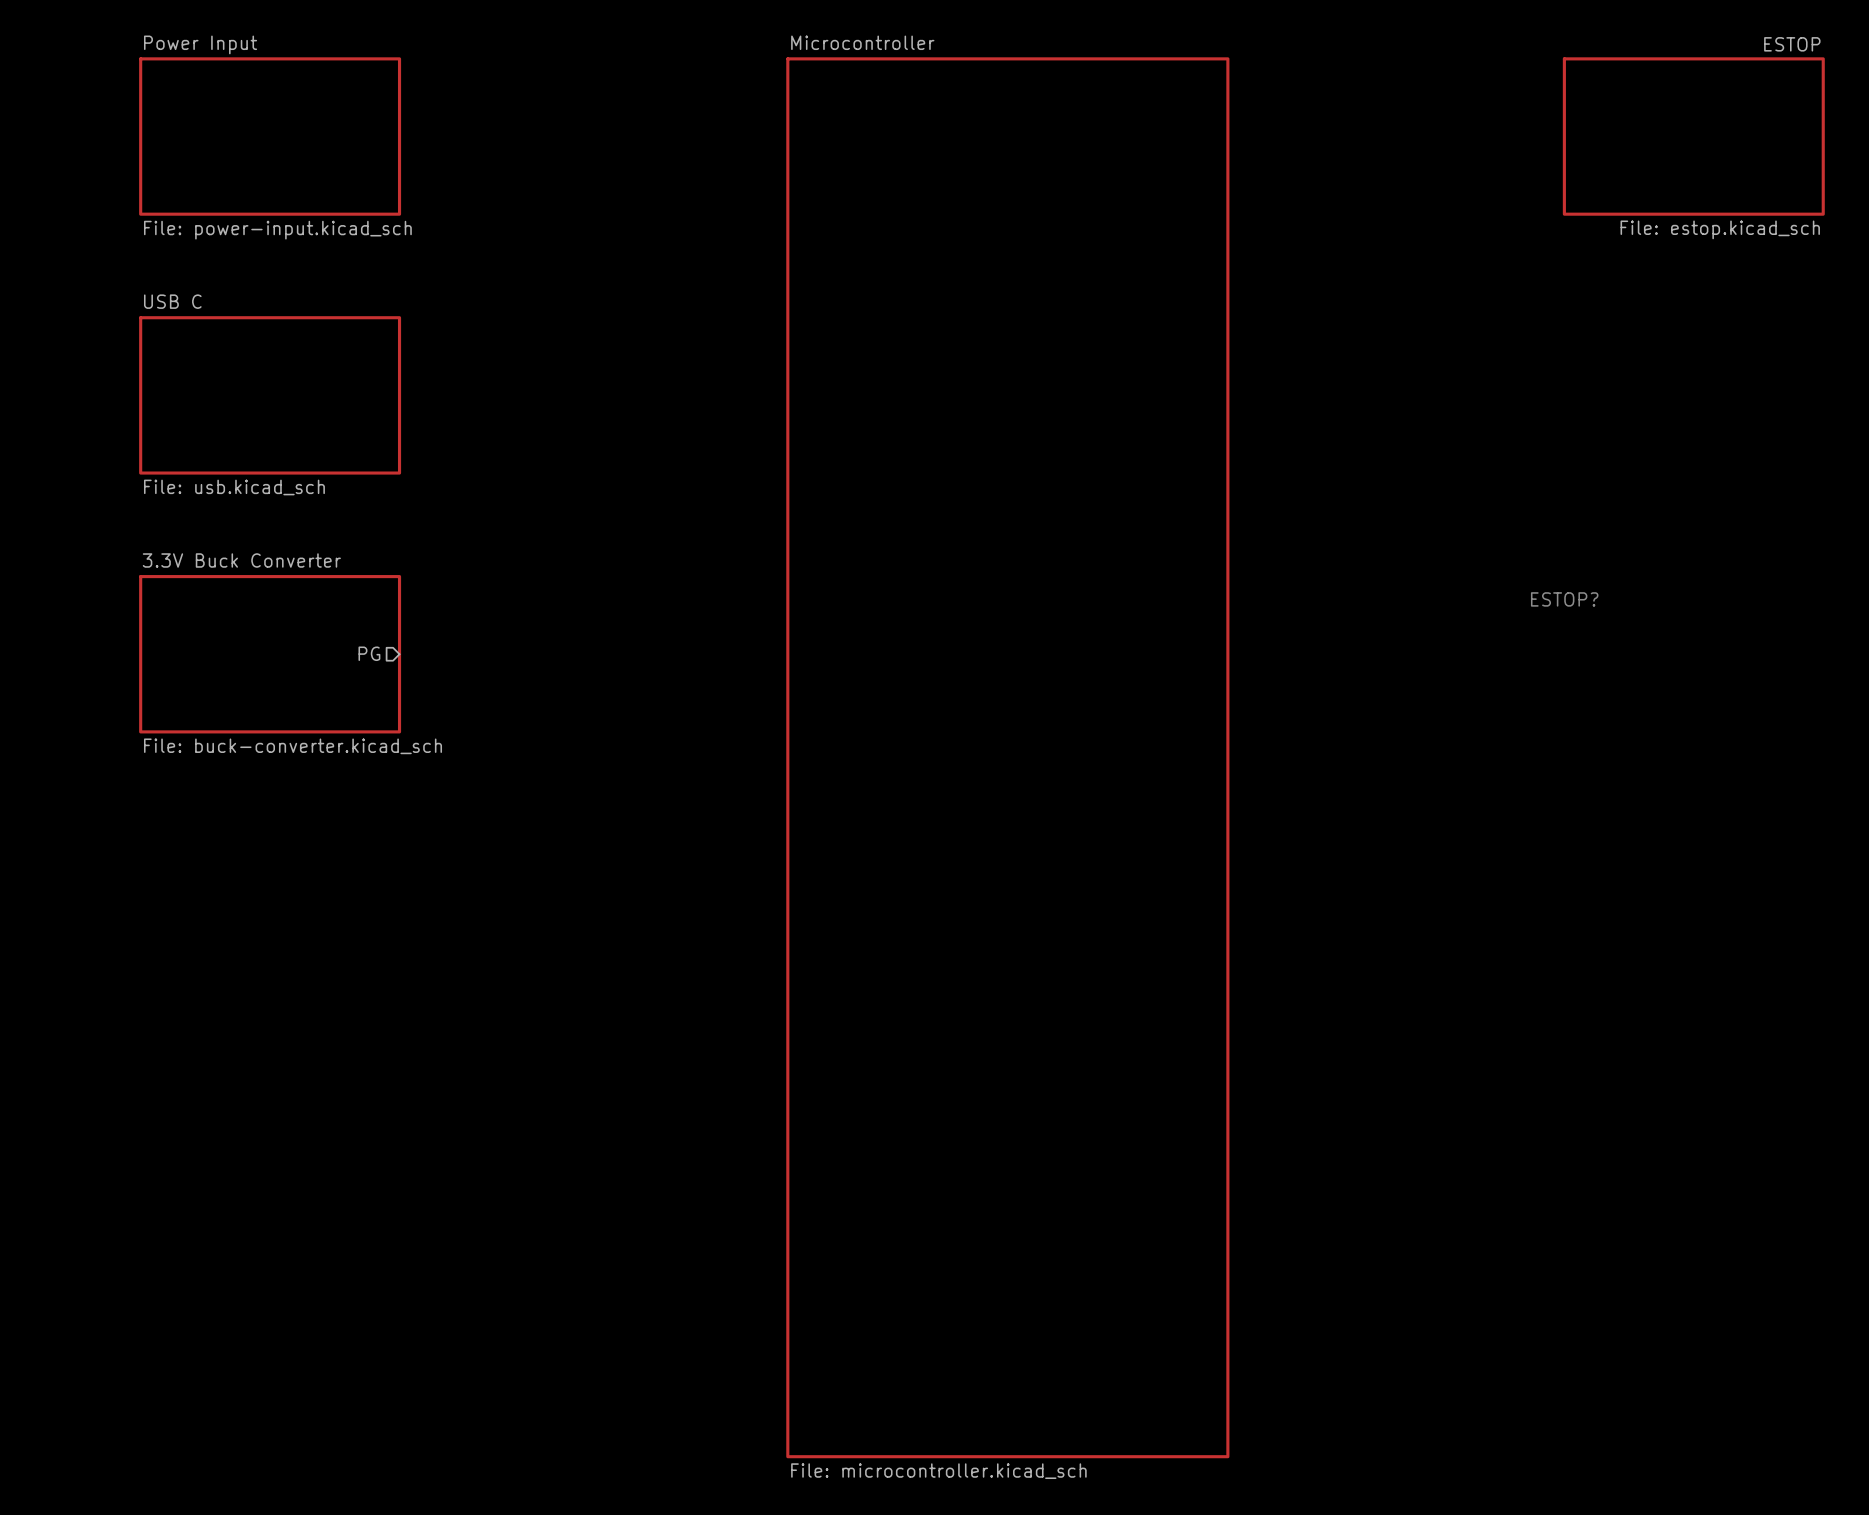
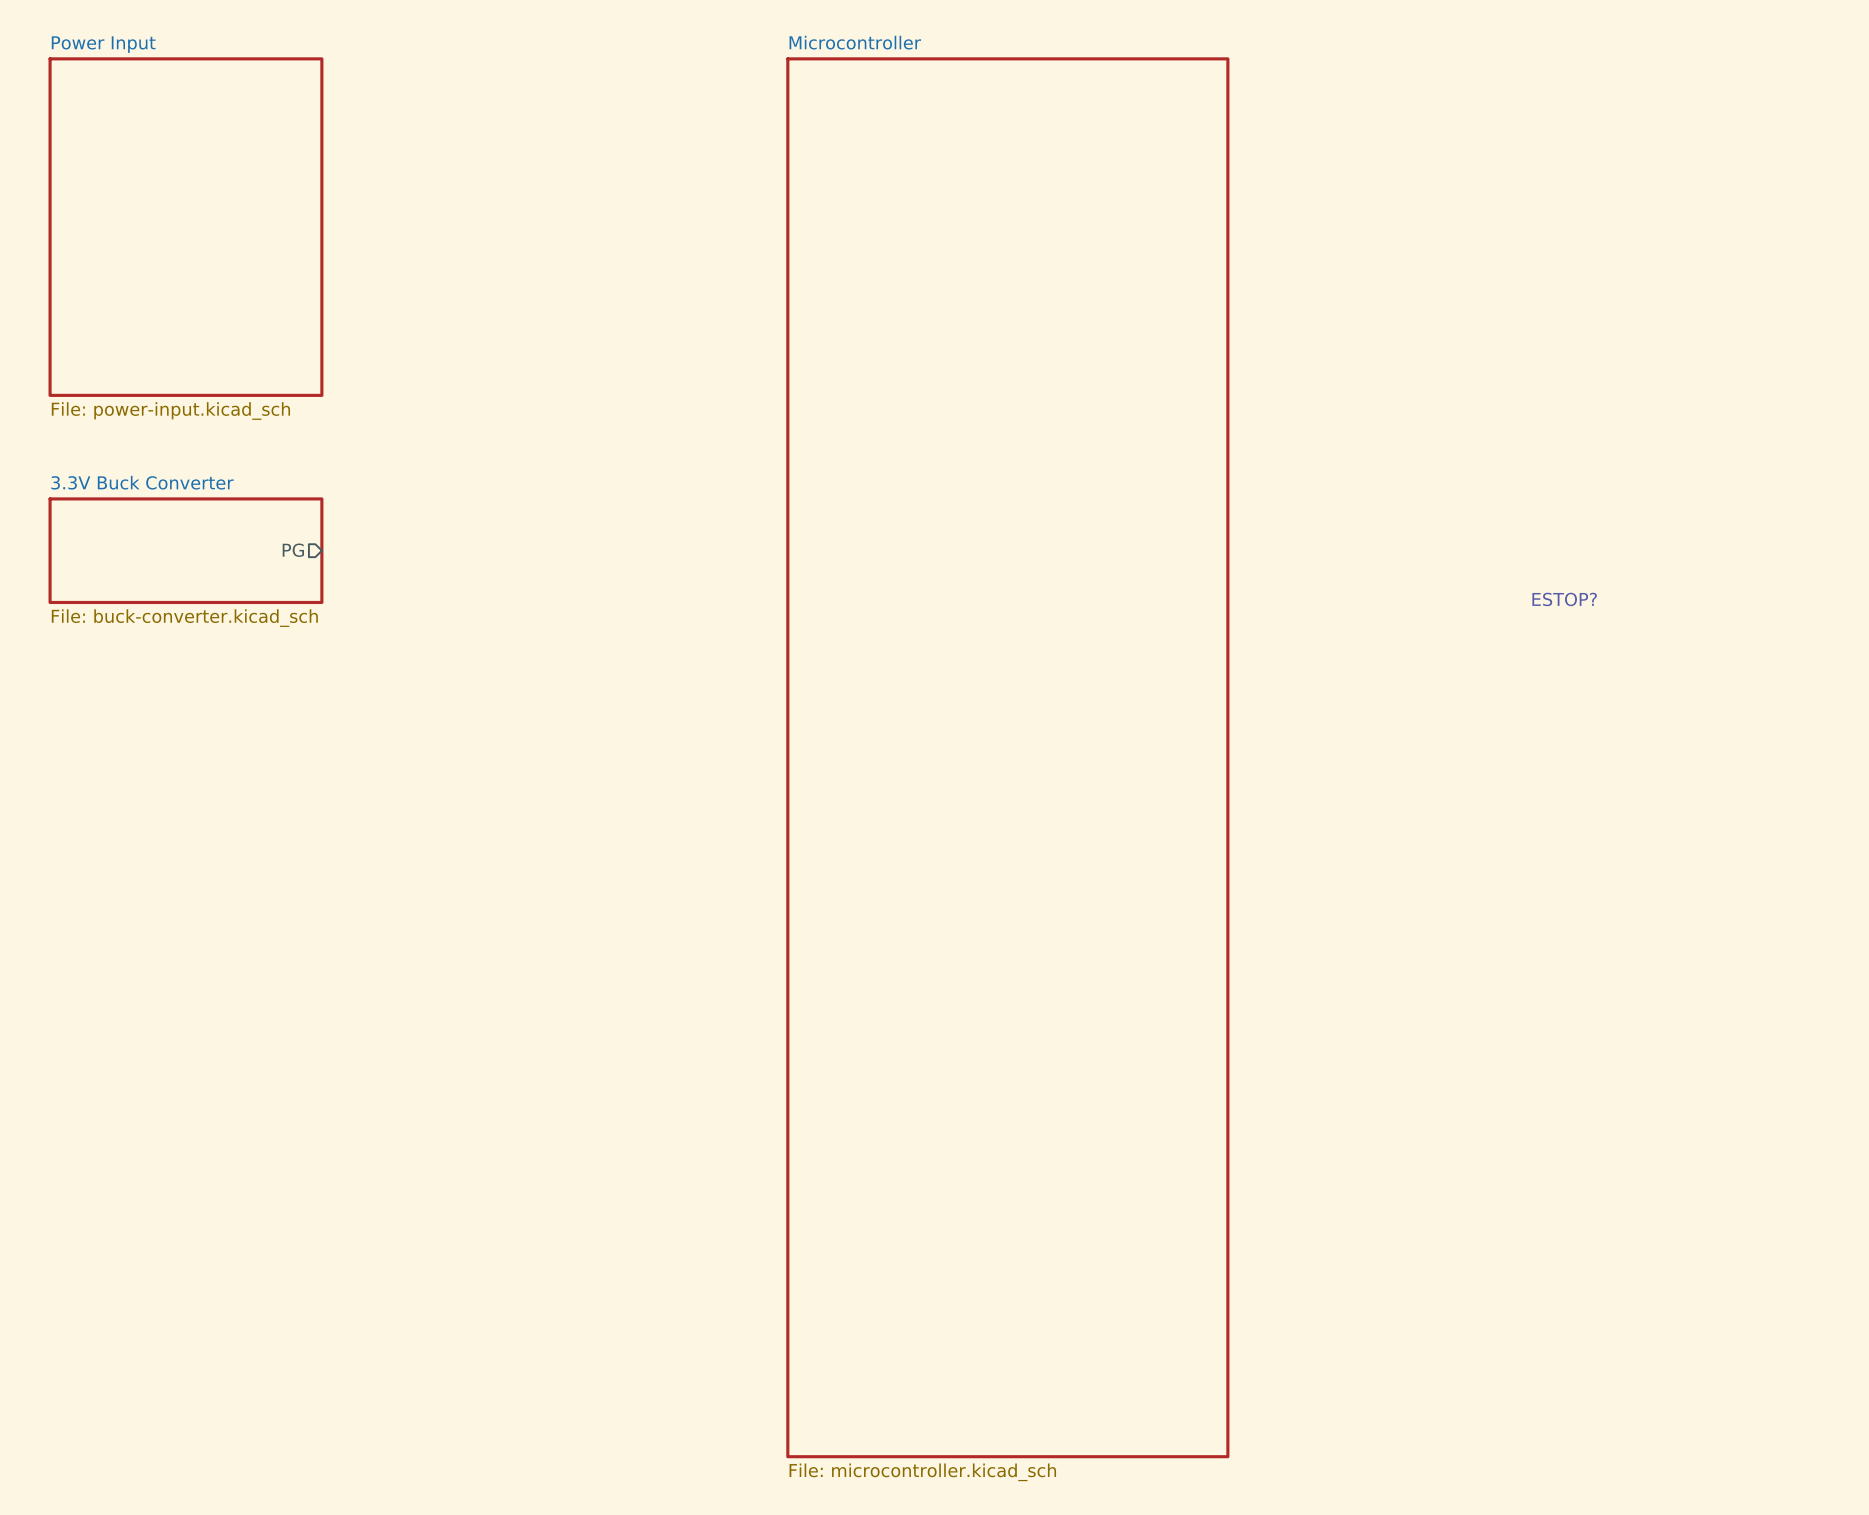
sheet Power Input: File: power-input.kicad_sch (270, 136) -> none
sheet ESTOP: File: estop.kicad_sch (1693, 136) -> none
sheet Power Input: none -> File: power-input.kicad_sch (185, 227)
sheet USB C: File: usb.kicad_sch (270, 395) -> none
sheet 3.3V Buck Converter name position: 3.3V Buck Converter (241, 560) -> 3.3V Buck Converter (142, 482)
sheet 3.3V Buck Converter shape: [139, 575, 402, 734] -> [48, 497, 324, 605]
sheet pin position: PG (369, 653) -> PG (293, 550)
sheet 3.3V Buck Converter value position: File: buck-converter.kicad_sch (293, 746) -> File: buck-converter.kicad_sch (184, 618)

